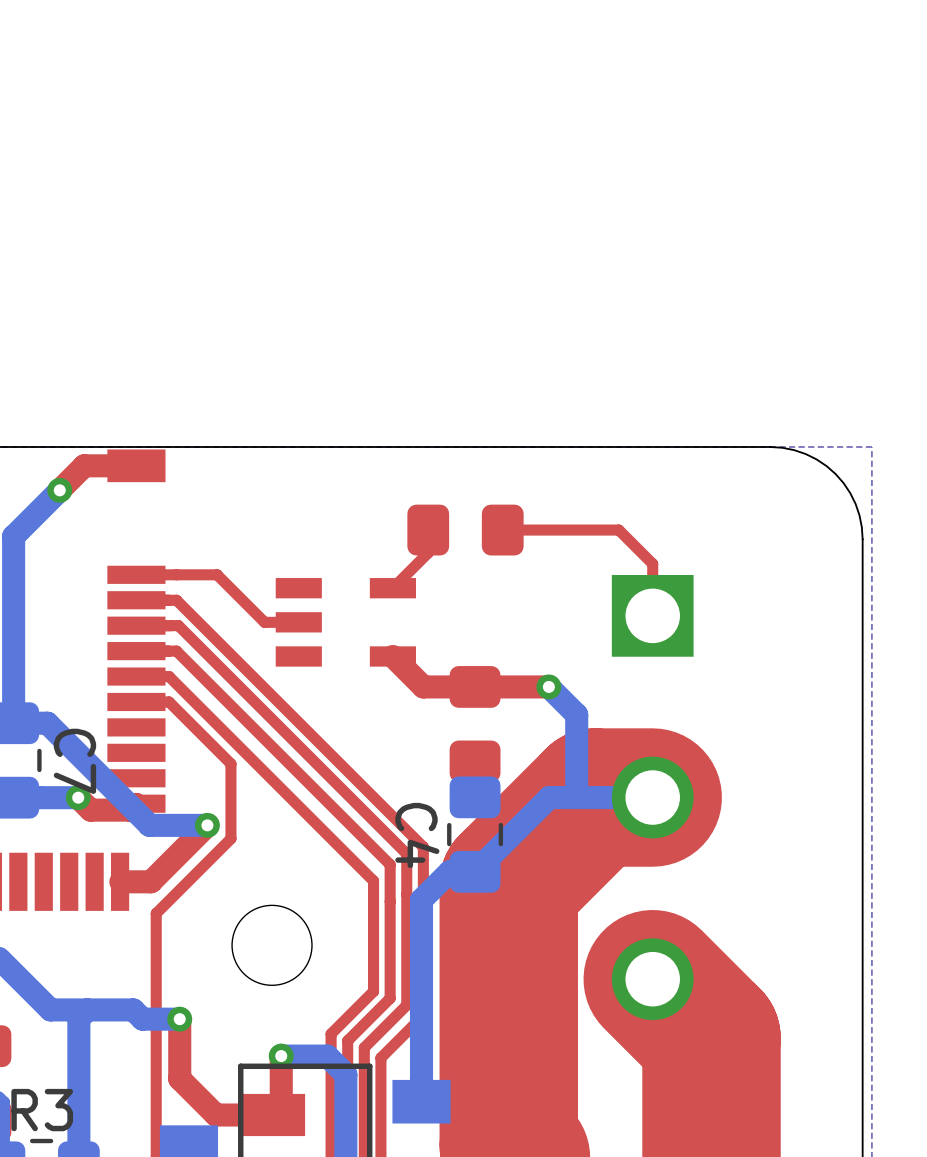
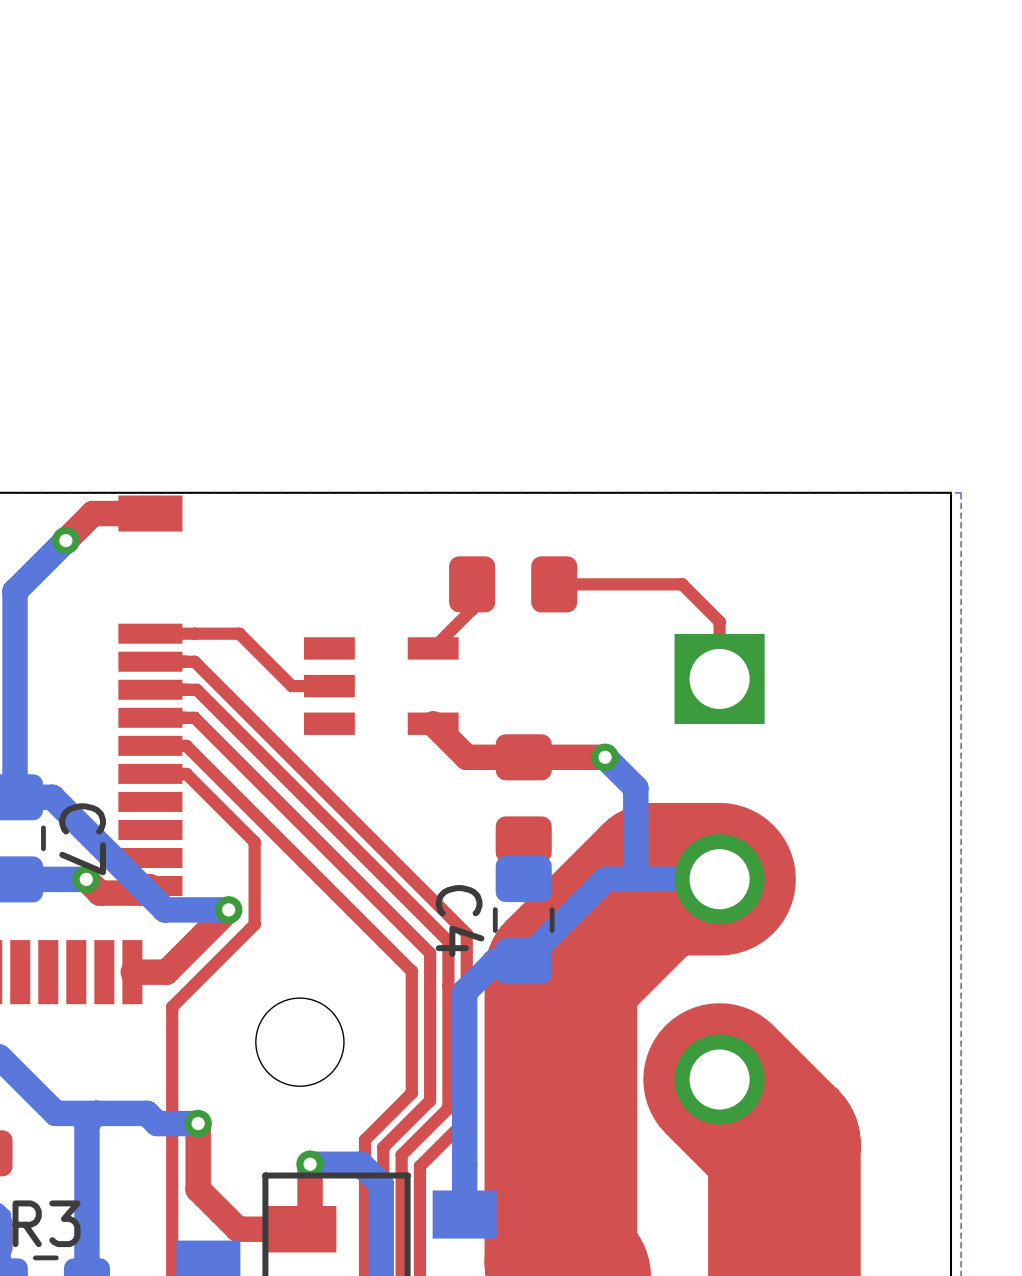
board edge: (770, 446) (794, 450) (805, 454) (826, 466) (835, 474) (843, 483) (855, 503) (859, 515) (862, 539) -> (849, 492) (951, 492) (951, 594)

